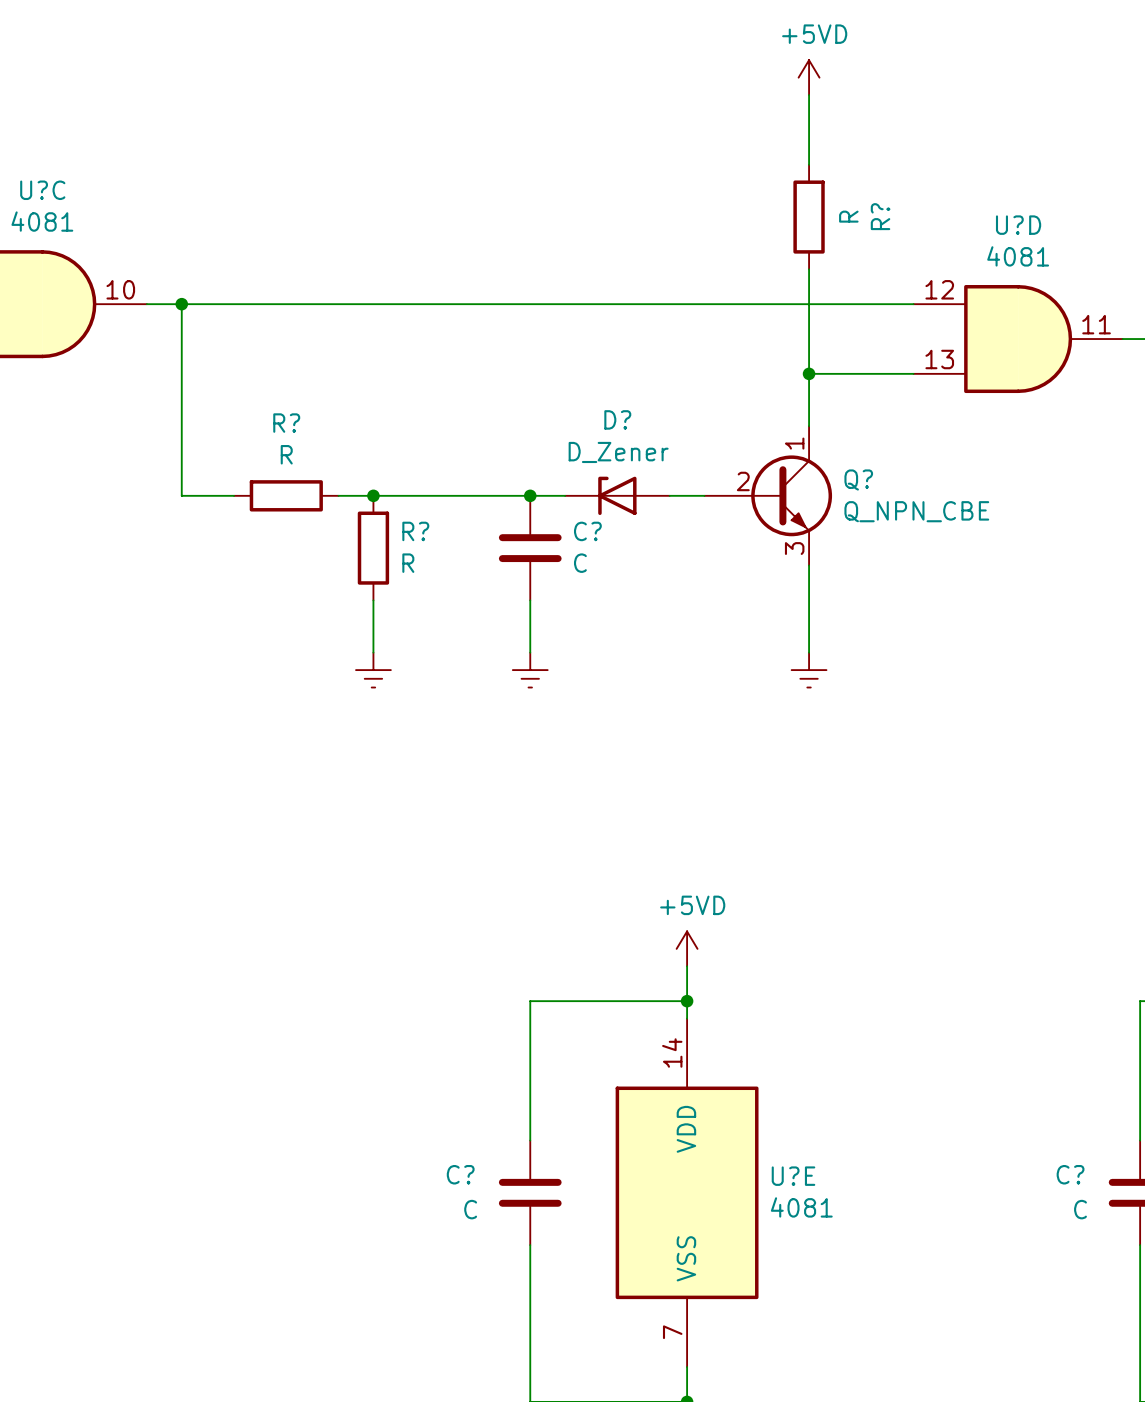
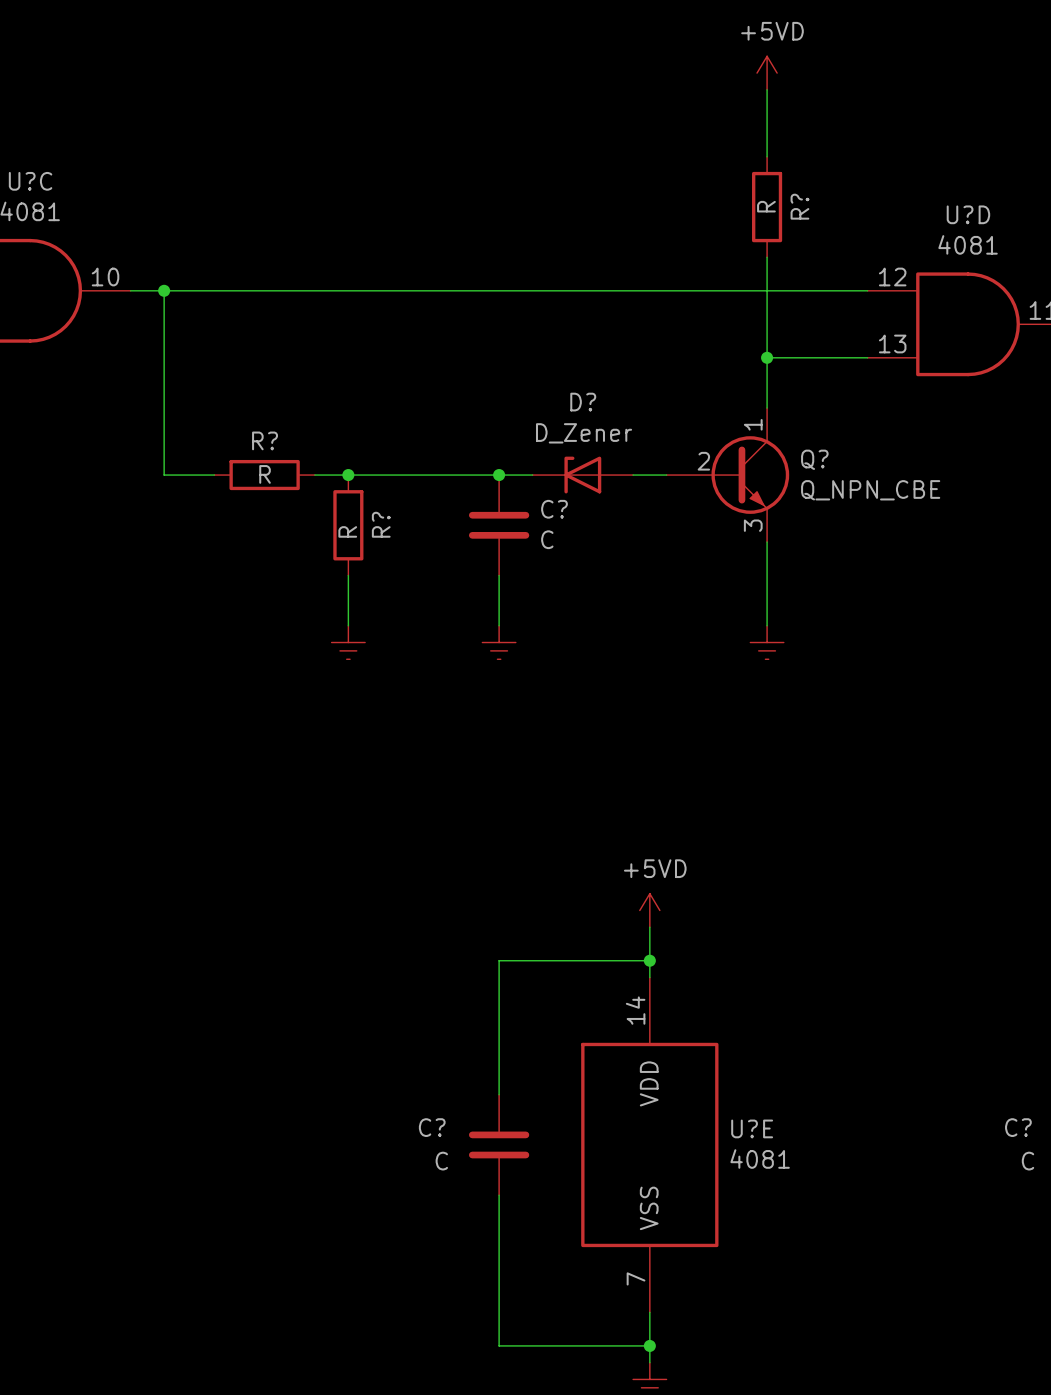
R? value position: R (848, 216) -> R (766, 206)
R? name position: R? (880, 216) -> R? (799, 206)
R? name position: R? (286, 423) -> R? (265, 440)
R? value position: R (286, 454) -> R (265, 474)
R? name rotation: 0° (415, 531) -> 90° counterclockwise (381, 524)
R? value rotation: 0° (408, 563) -> 90° counterclockwise (347, 531)
R? value position: R (408, 563) -> R (347, 531)

